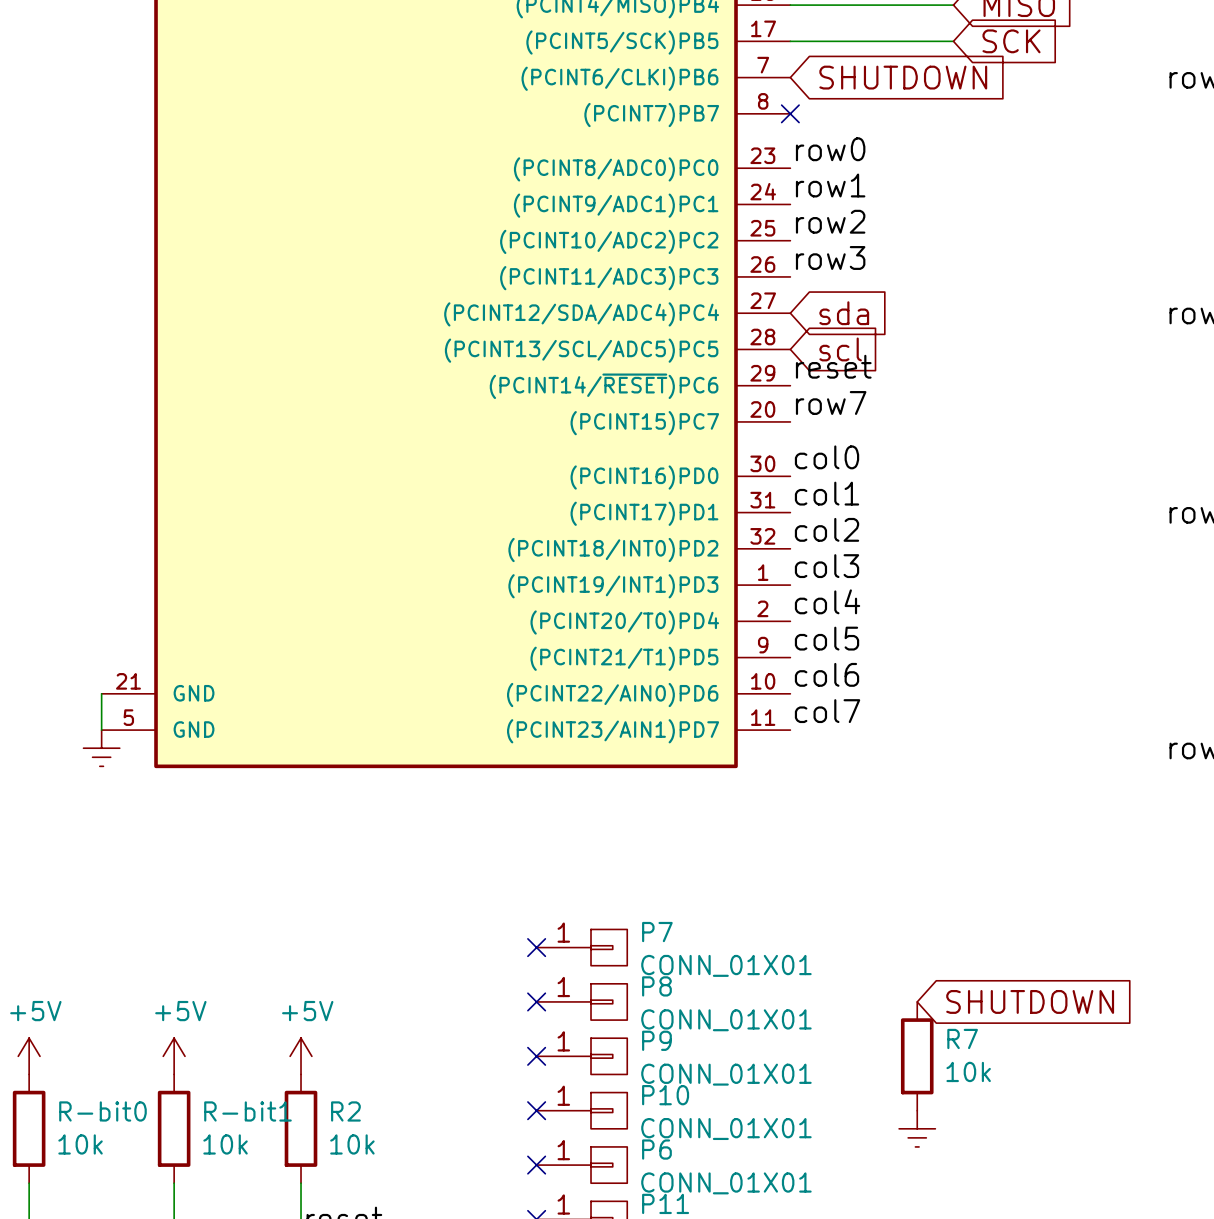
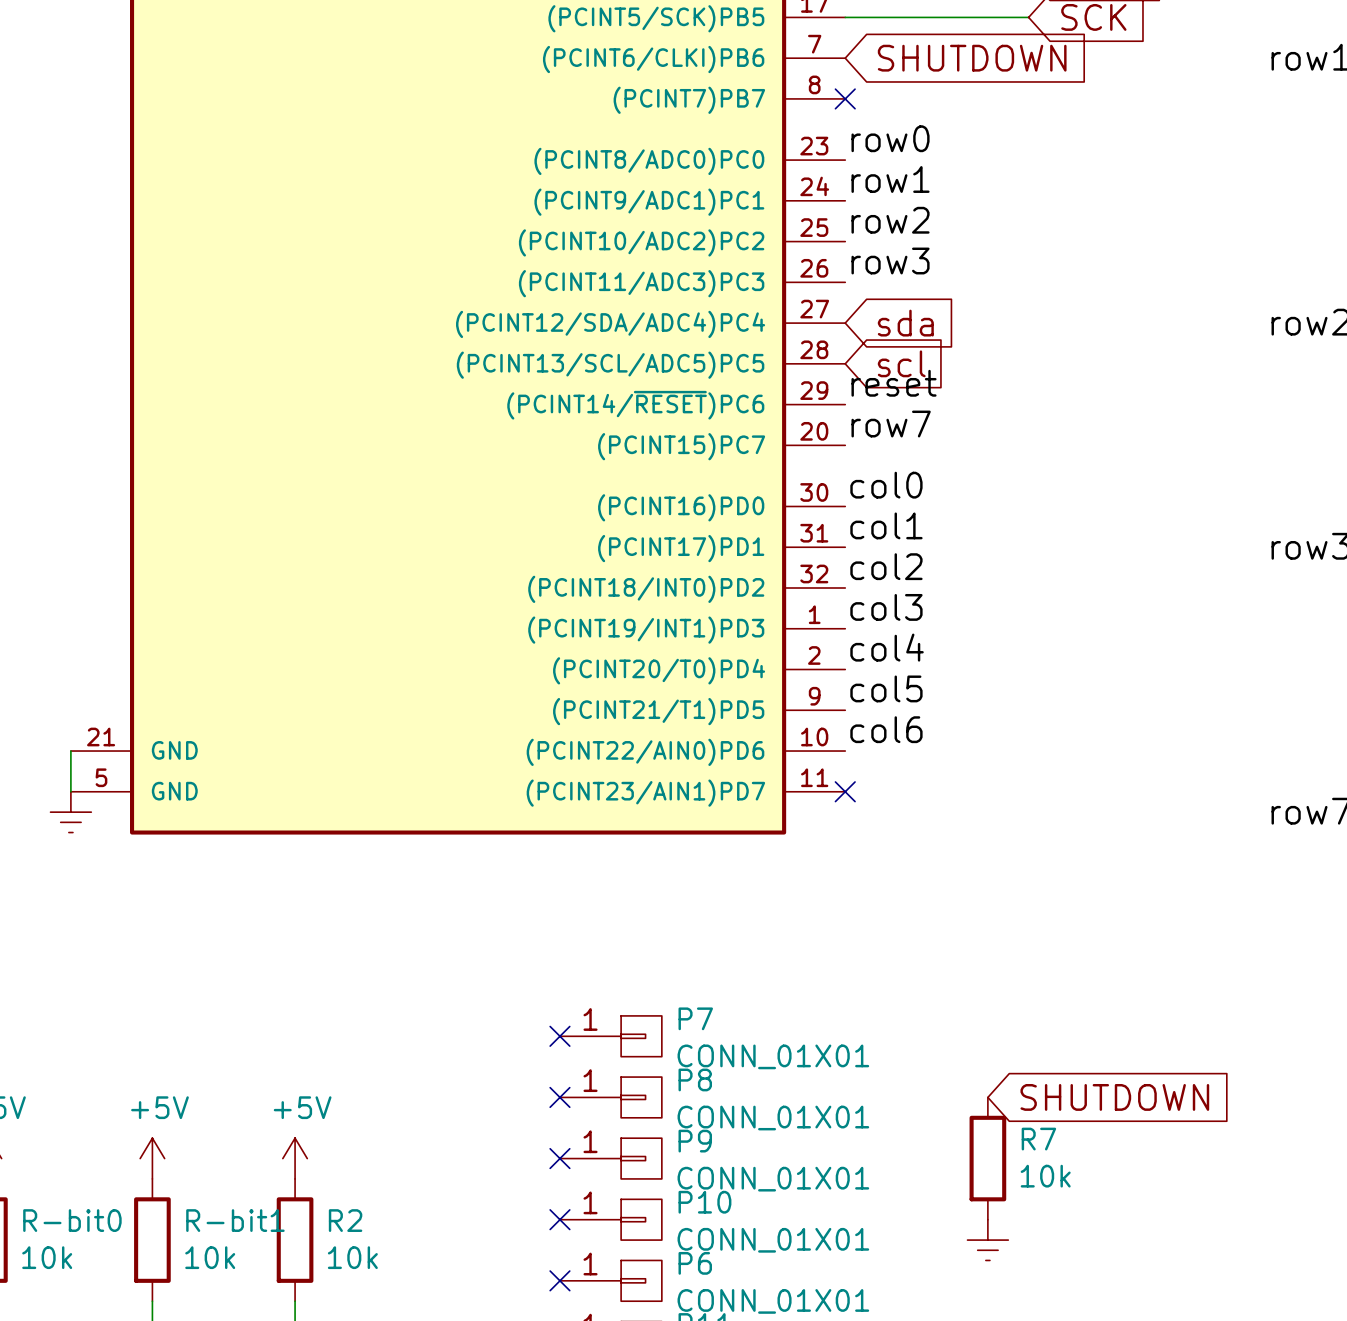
label: col7 (827, 711) -> none
no-connect mark: none -> (845, 791)

